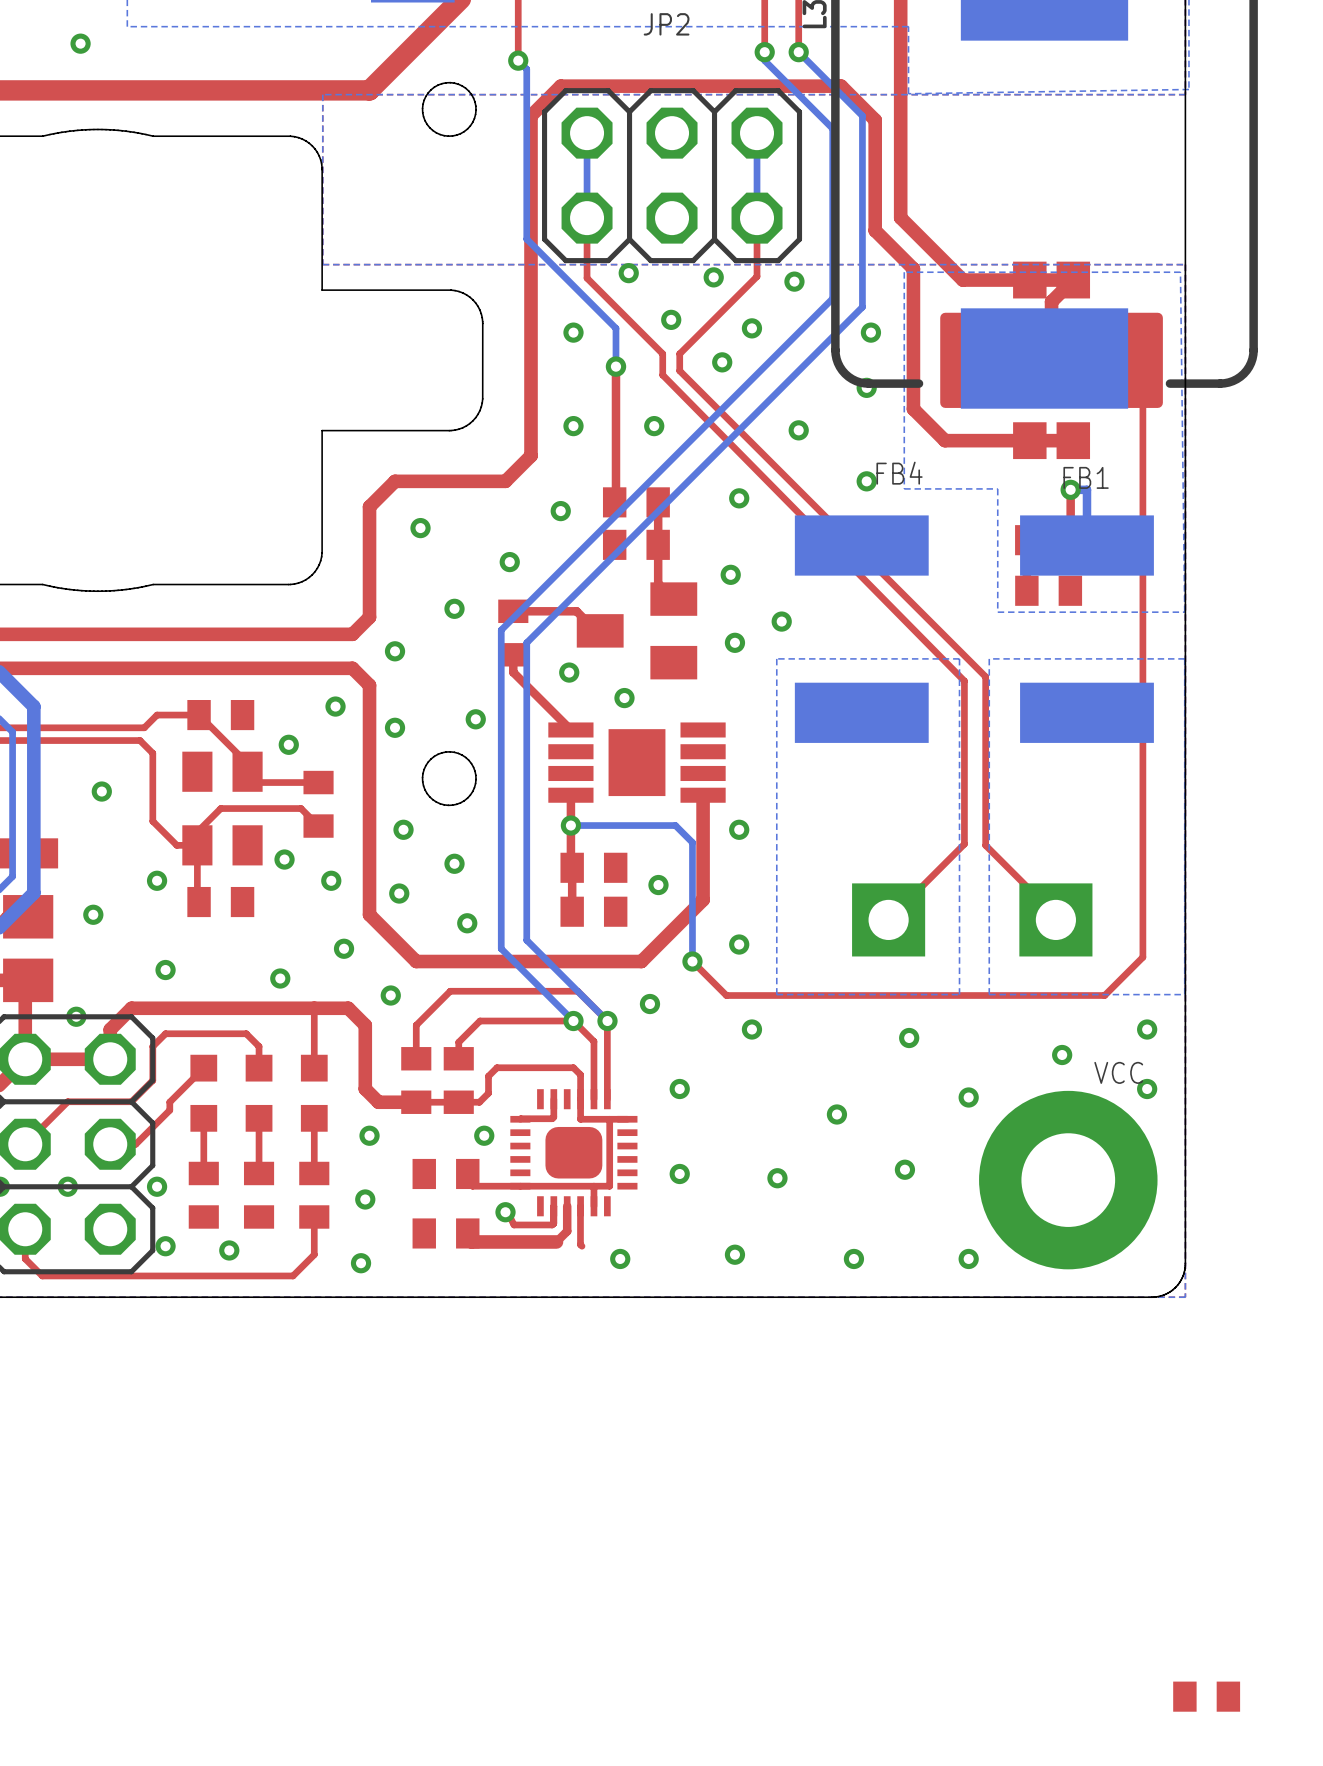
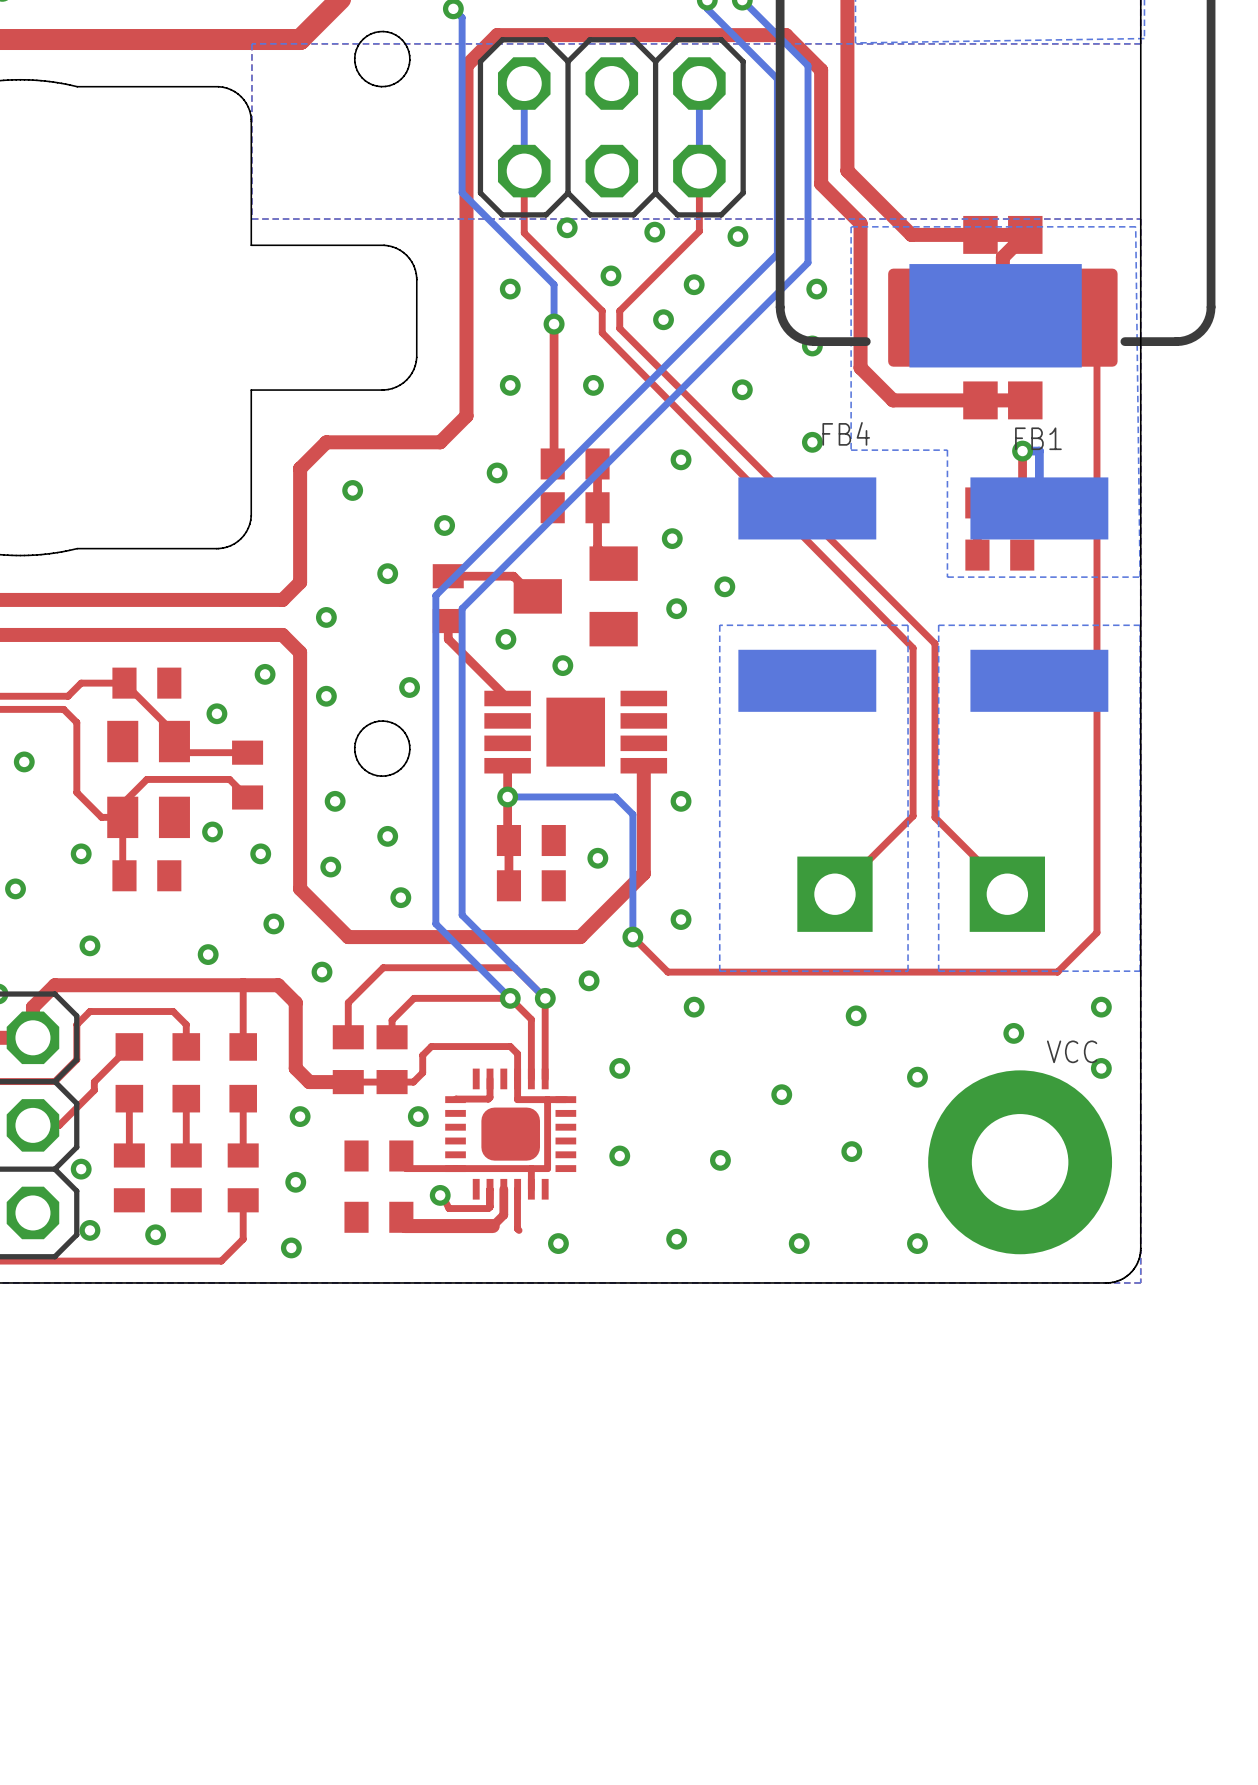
part: (1206, 1696) -> none

